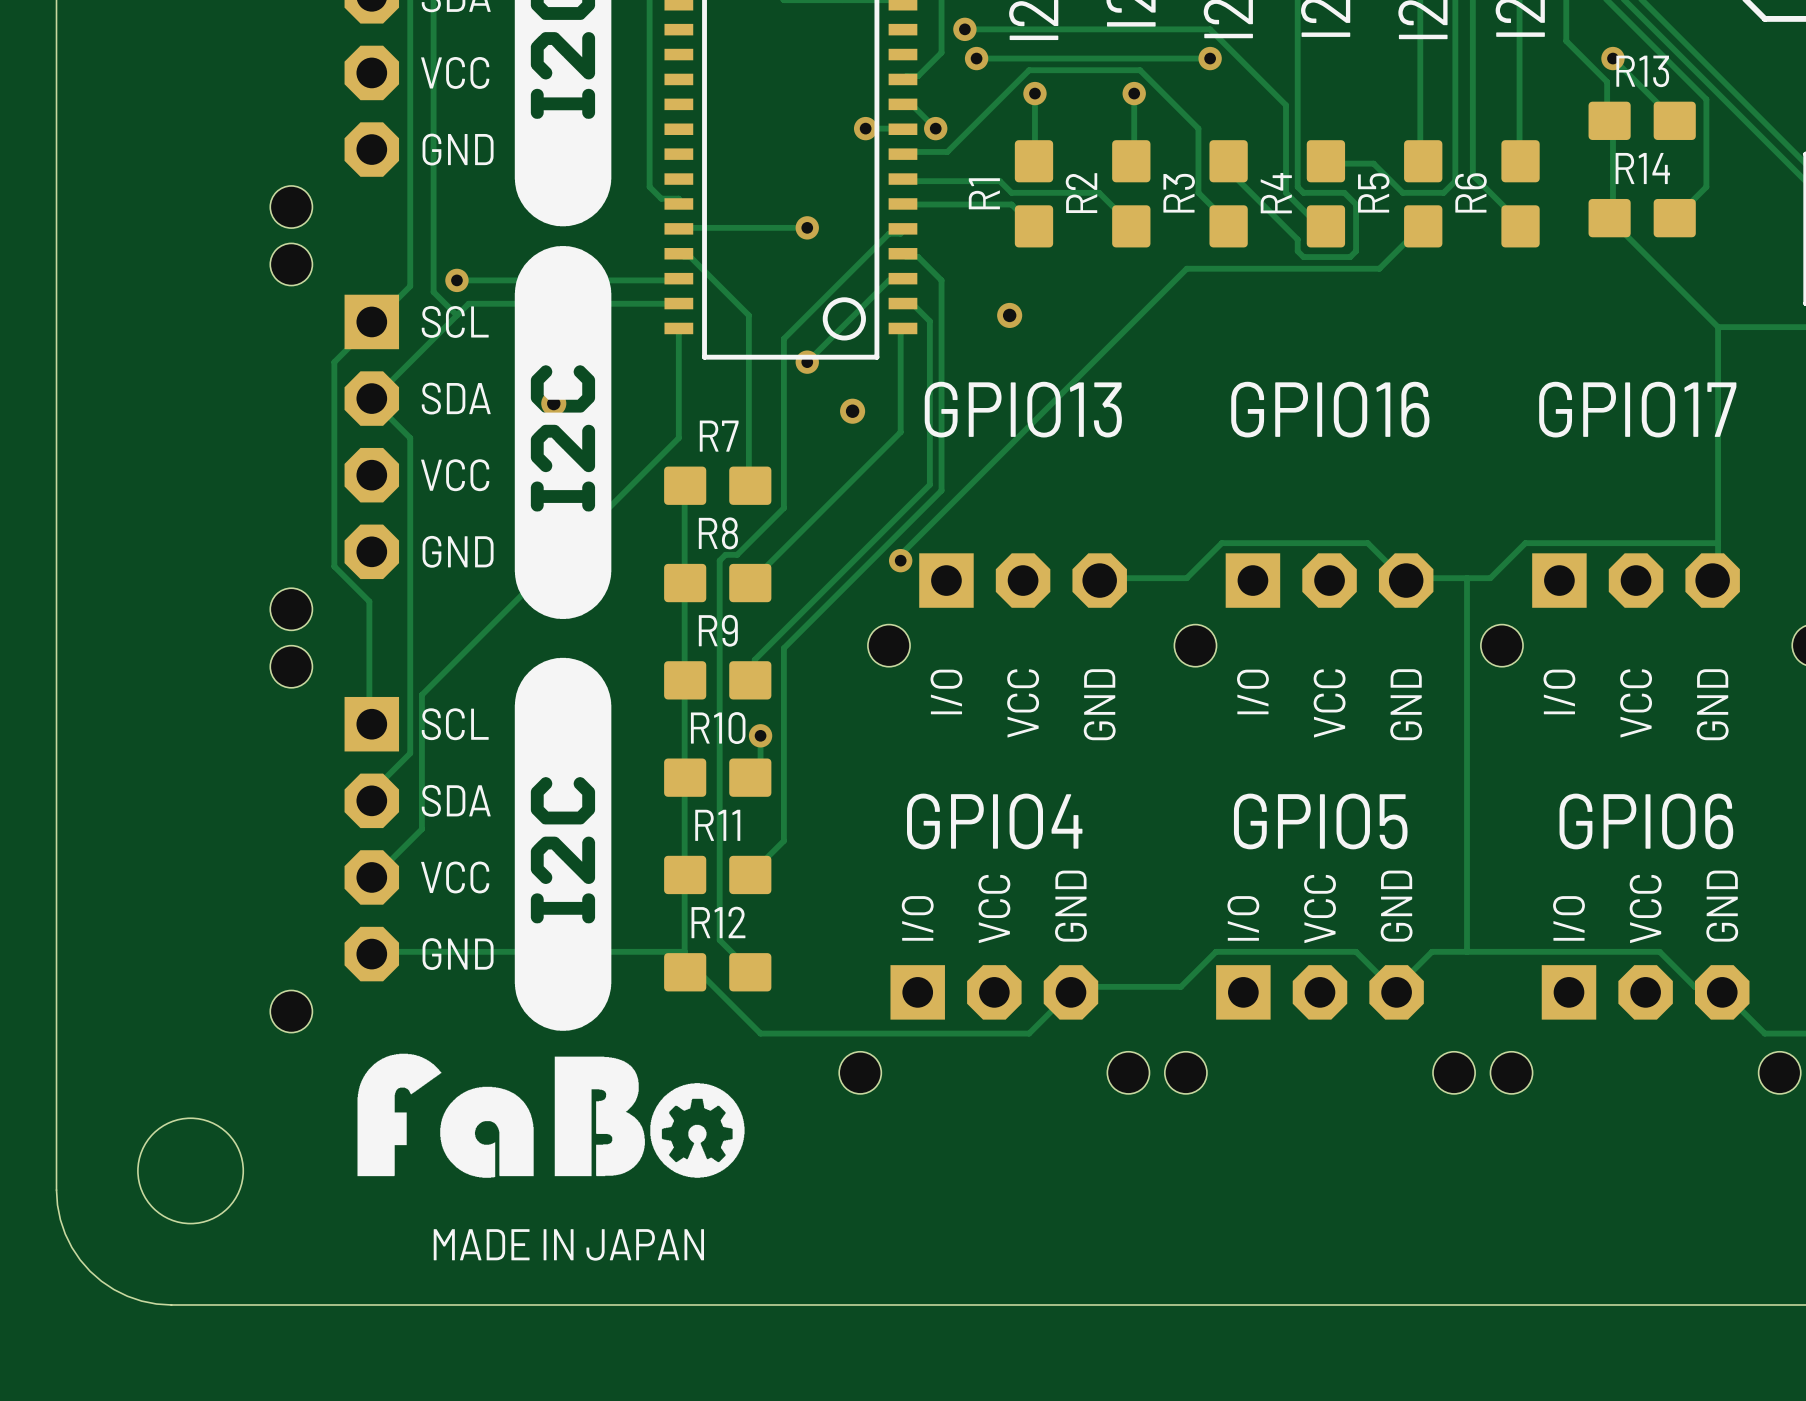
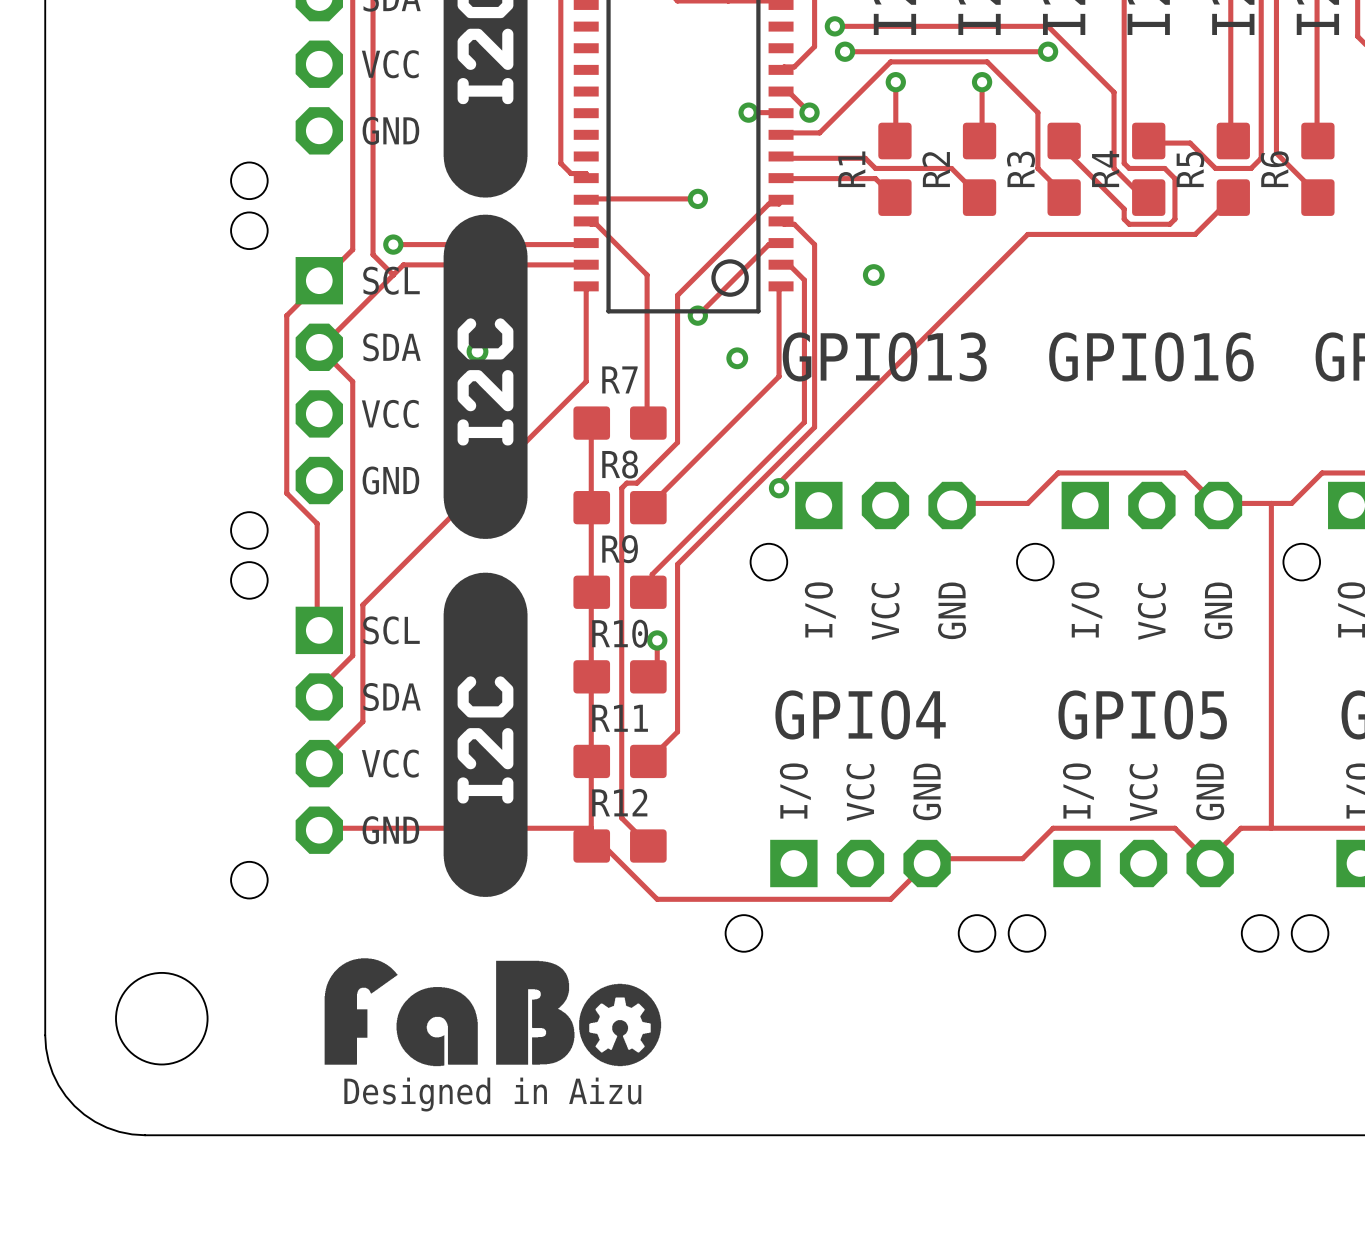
drawing position: (551, 1115) -> (492, 1012)
text: MADE IN JAPAN (568, 1244) -> Designed in Aizu (492, 1094)

